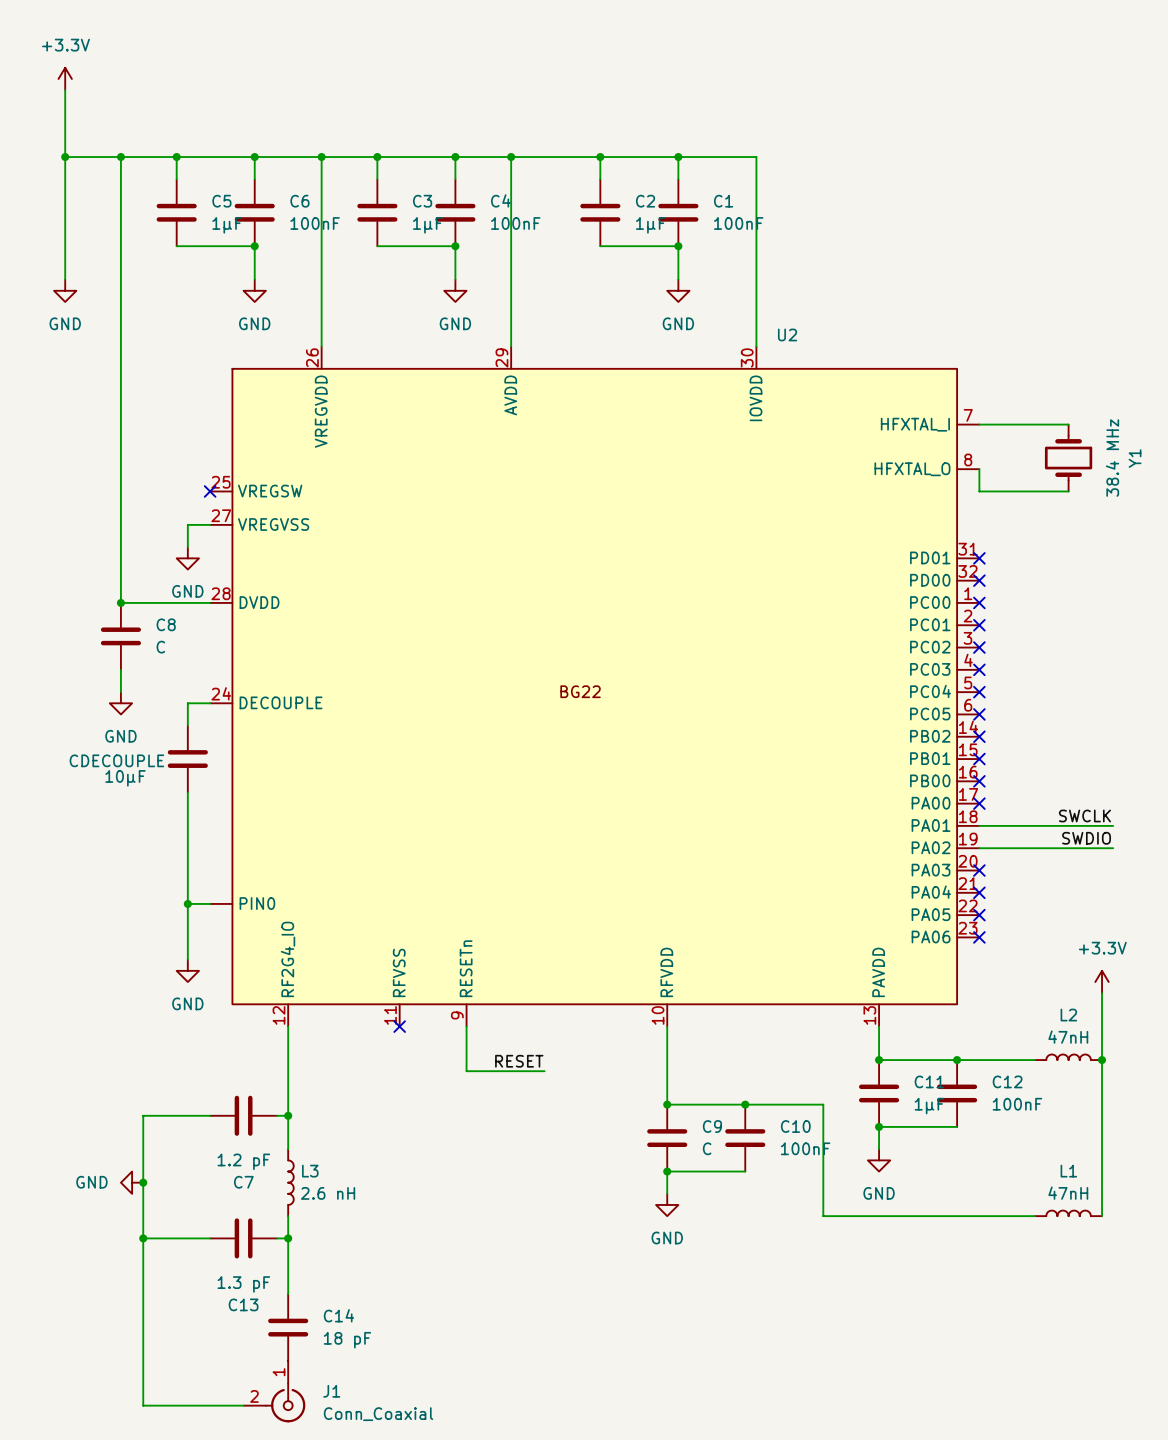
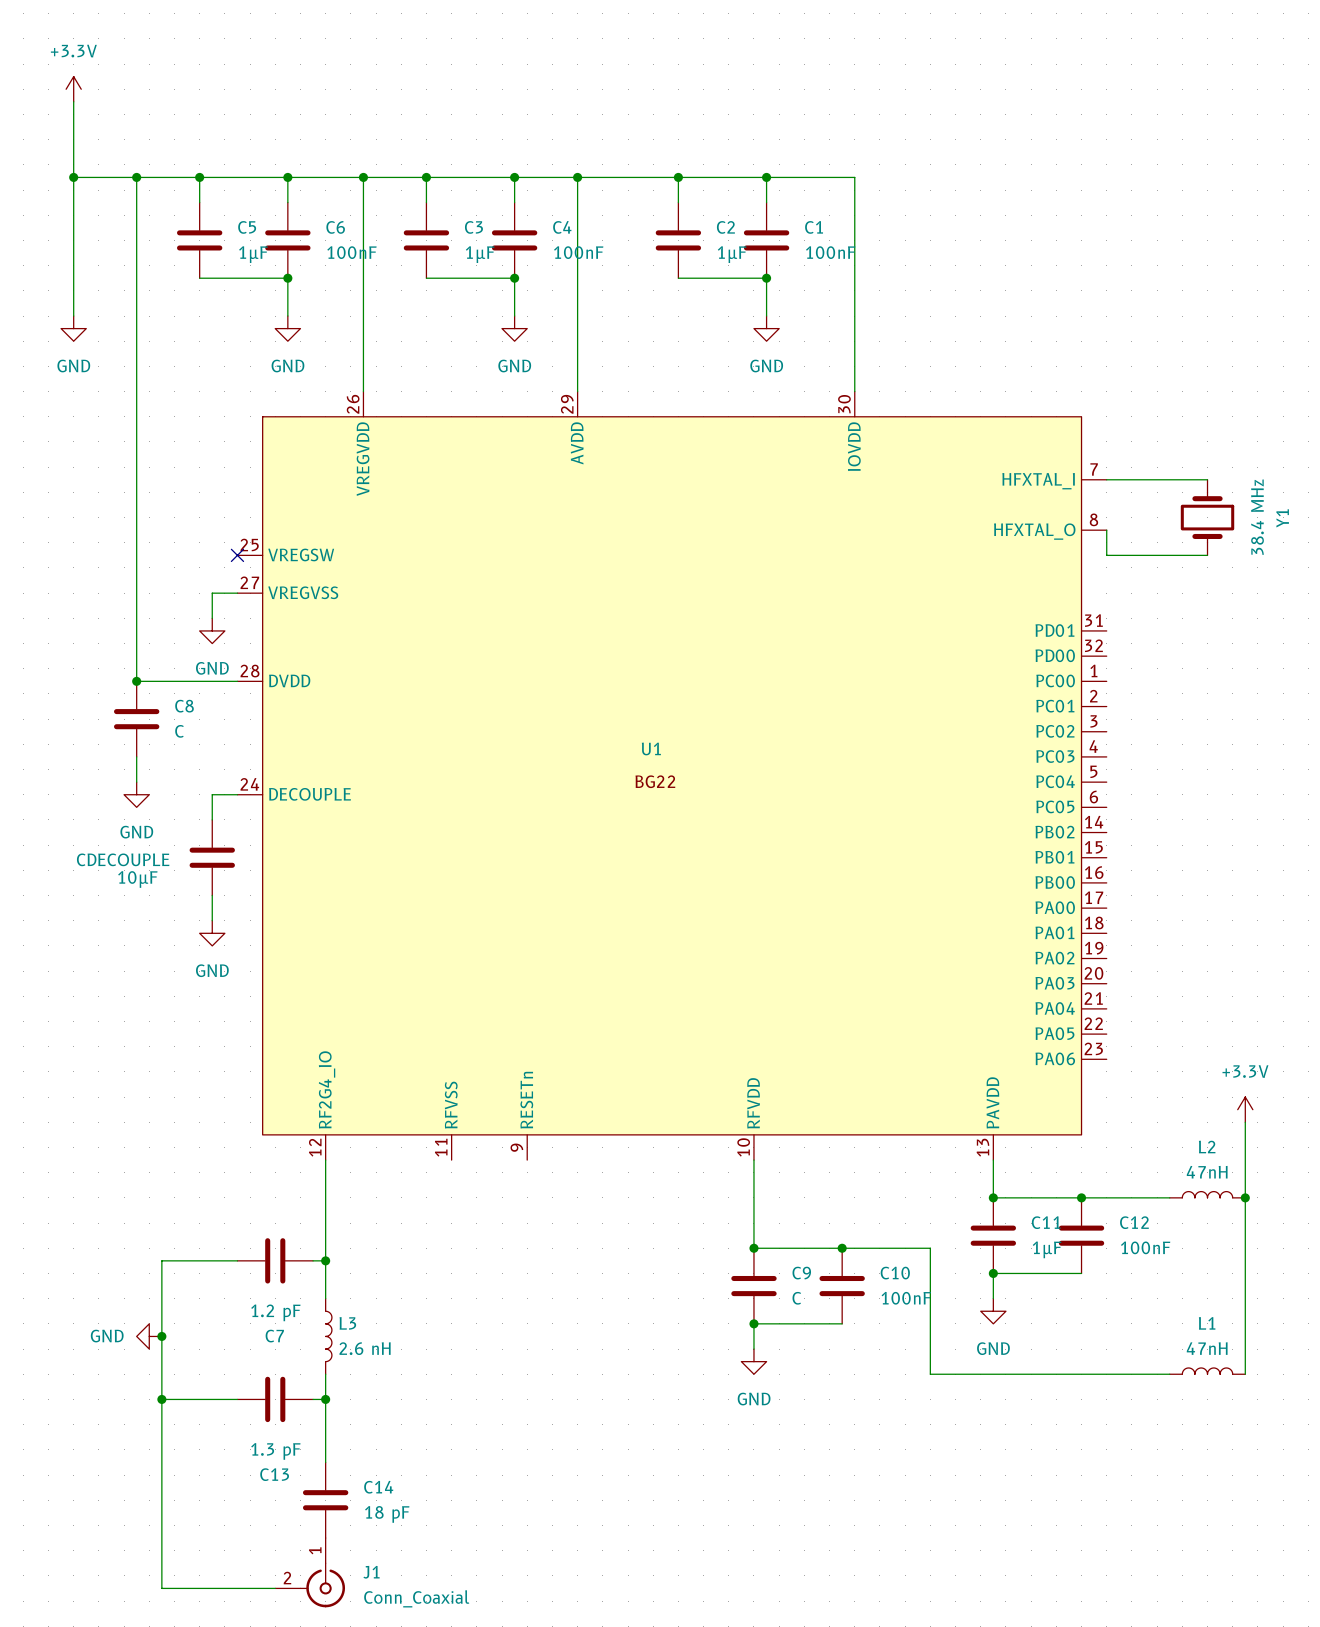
no-connect mark: (979, 558) -> none
no-connect mark: (979, 580) -> none
no-connect mark: (979, 602) -> none
no-connect mark: (979, 625) -> none
no-connect mark: (979, 647) -> none
no-connect mark: (979, 669) -> none
U2: (594, 686) -> none
U1: none -> (672, 775)
no-connect mark: (979, 692) -> none
no-connect mark: (979, 714) -> none
no-connect mark: (979, 736) -> none
no-connect mark: (979, 759) -> none
no-connect mark: (979, 781) -> none
no-connect mark: (979, 803) -> none
wire: (187, 814) (187, 959) -> none
label: SWCLK (1084, 815) -> none
wire: (979, 825) (1113, 825) -> none
label: SWDIO (1086, 838) -> none
wire: (979, 848) (1113, 848) -> none
no-connect mark: (979, 870) -> none
no-connect mark: (979, 892) -> none
wire: (187, 903) (210, 903) -> none
junction: (187, 903) -> none
no-connect mark: (979, 915) -> none
no-connect mark: (979, 937) -> none
power symbol position: GND (187, 970) -> GND (212, 933)
no-connect mark: (399, 1026) -> none
wire: (466, 1026) (466, 1071) (544, 1071) -> none
label: RESET (519, 1061) -> none

